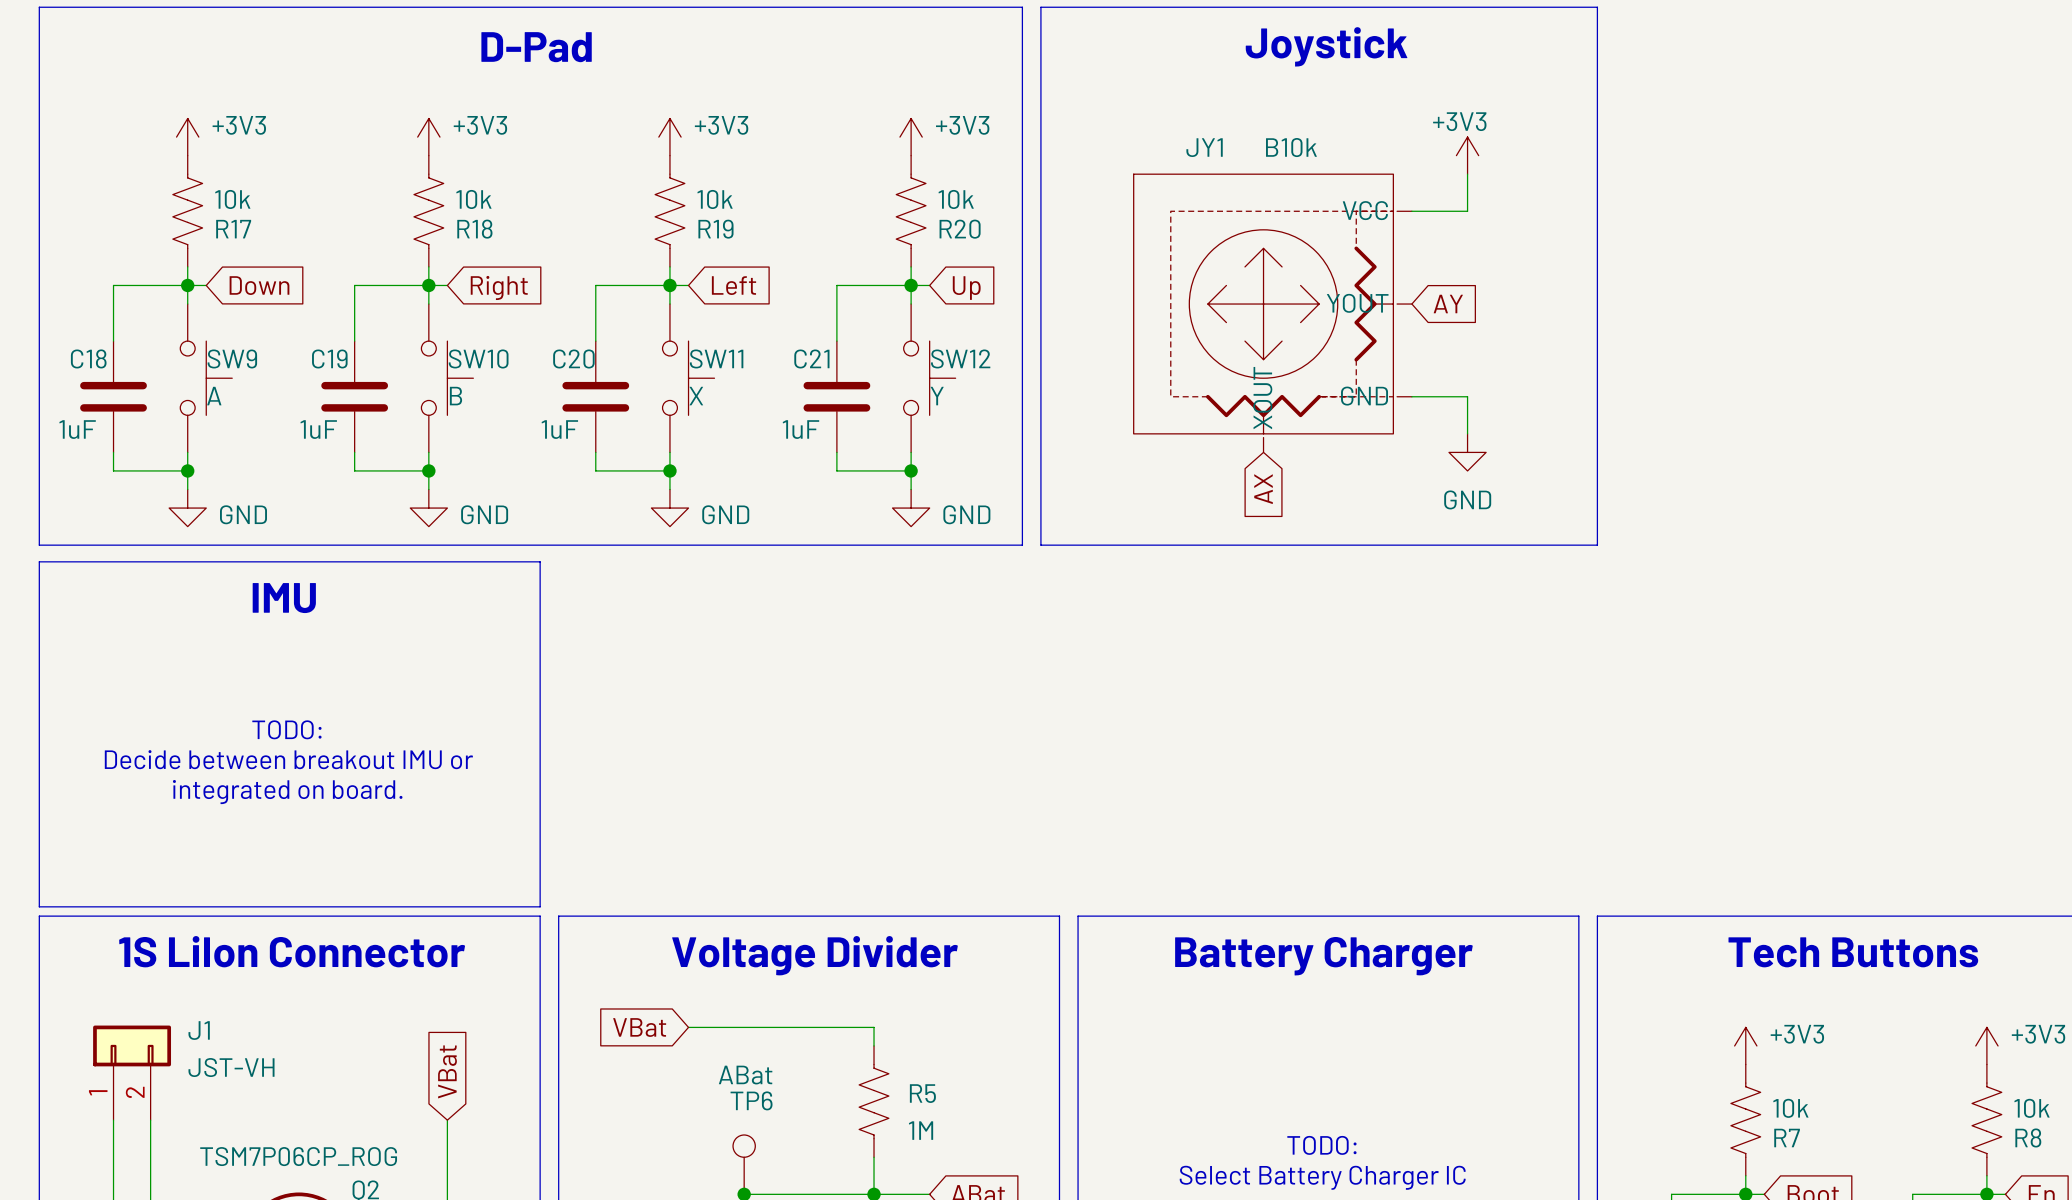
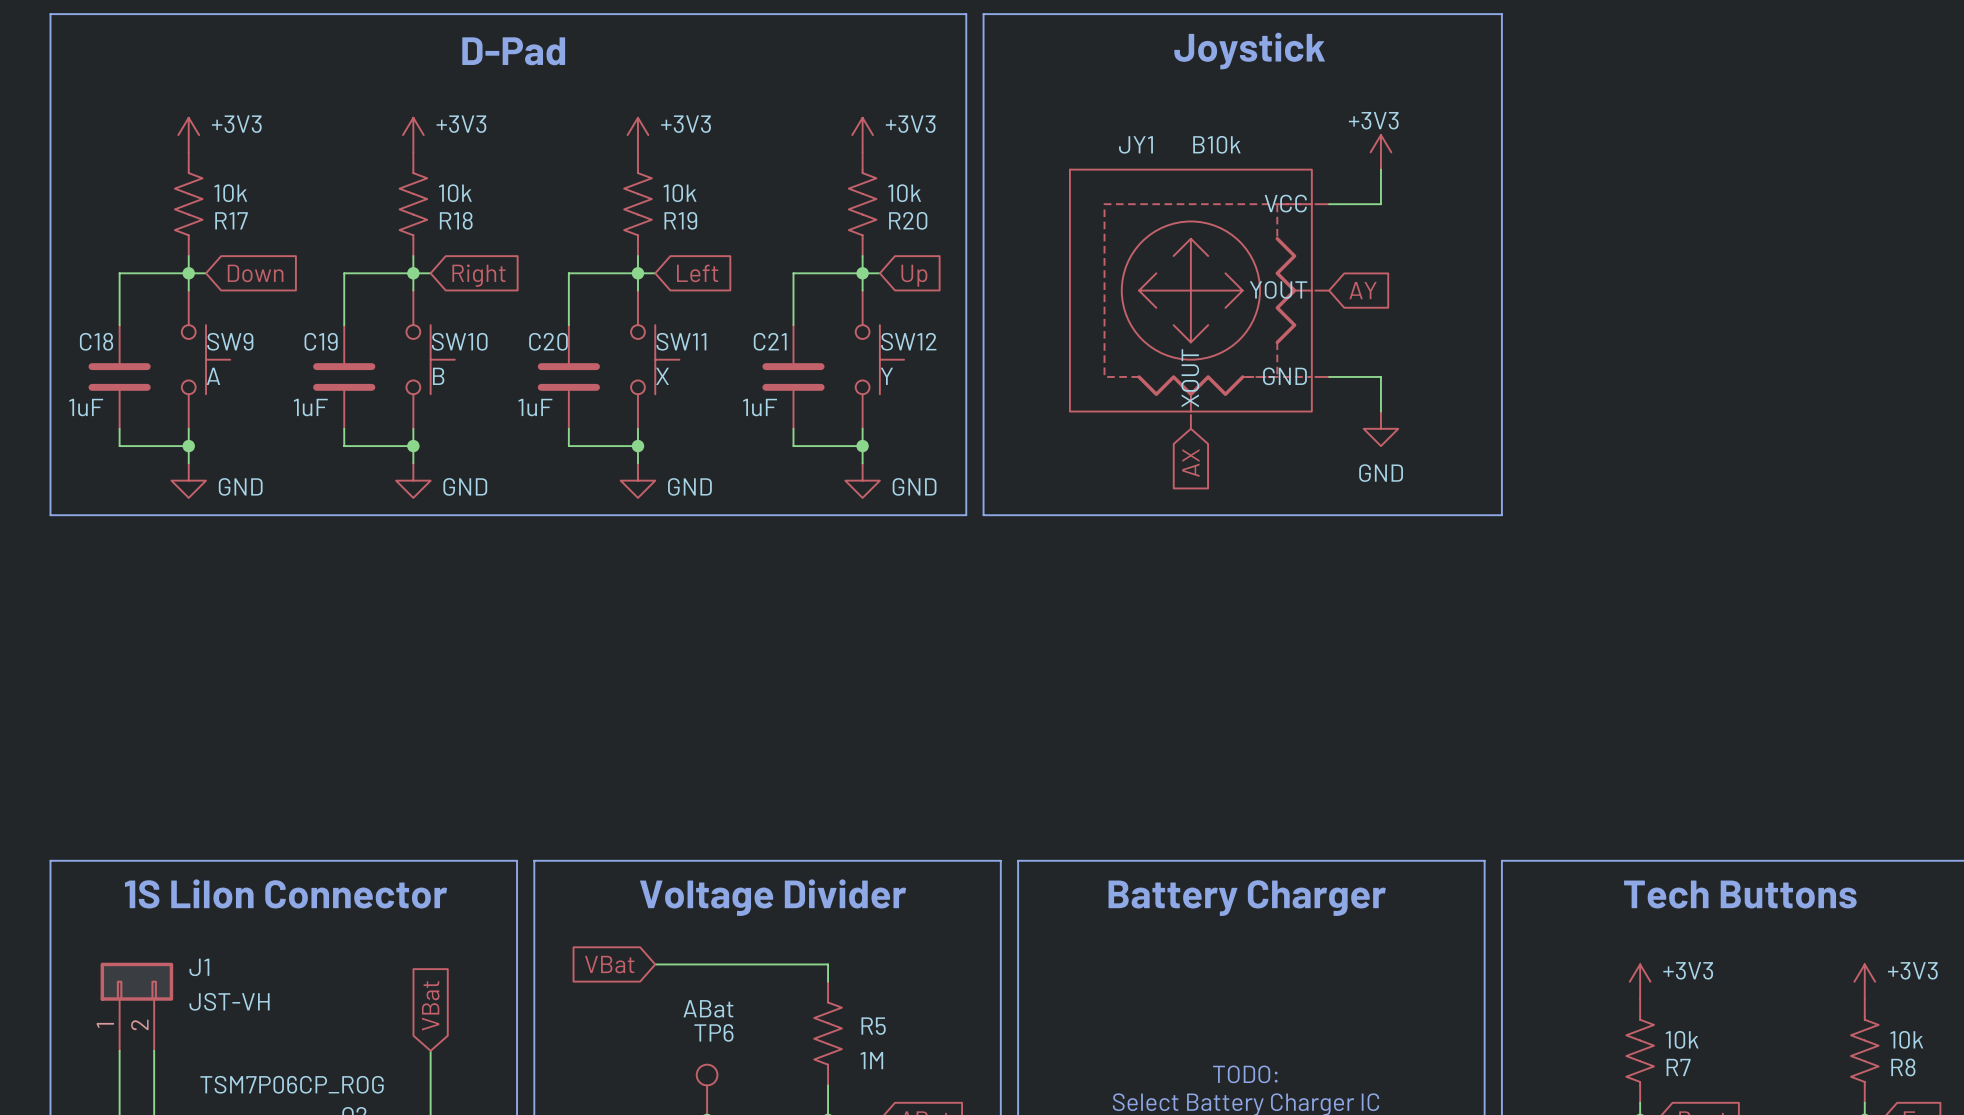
line: (39, 561) (39, 906) (540, 906) (540, 561) (39, 561) -> none
text: IMU (284, 598) -> none
text: TODO: (286, 729) -> none
text: Decide between breakout IMU or (288, 759) -> none
text: integrated on board. (287, 792) -> none

